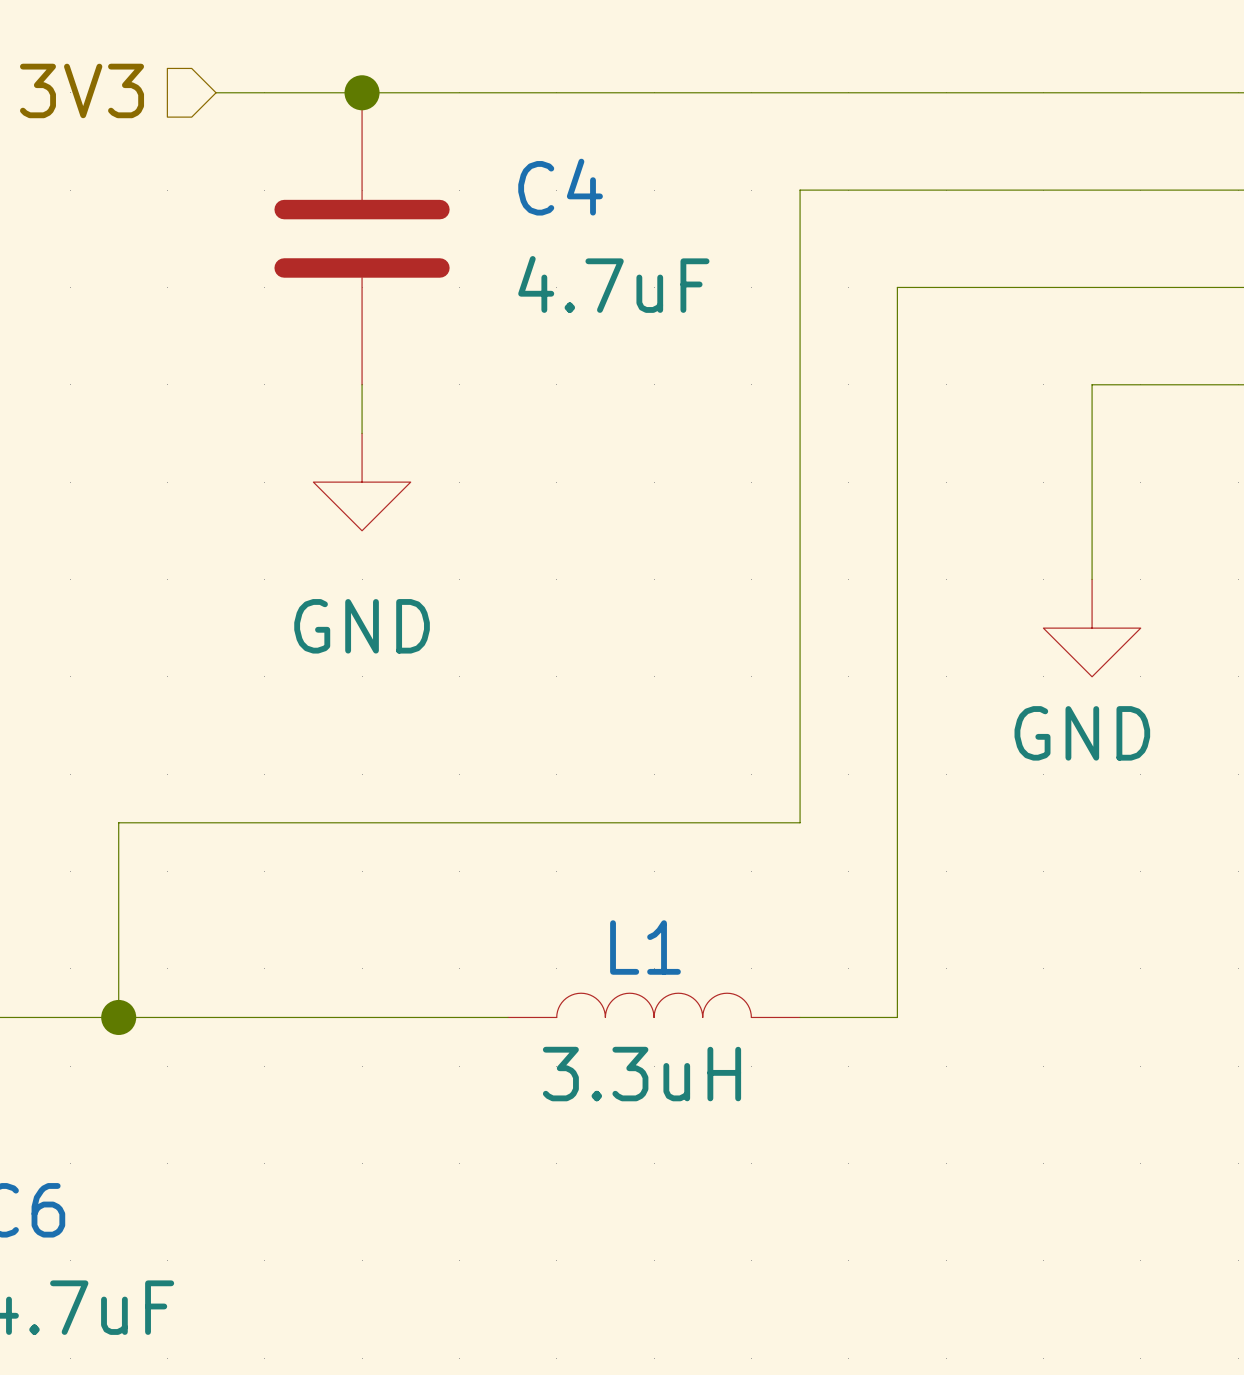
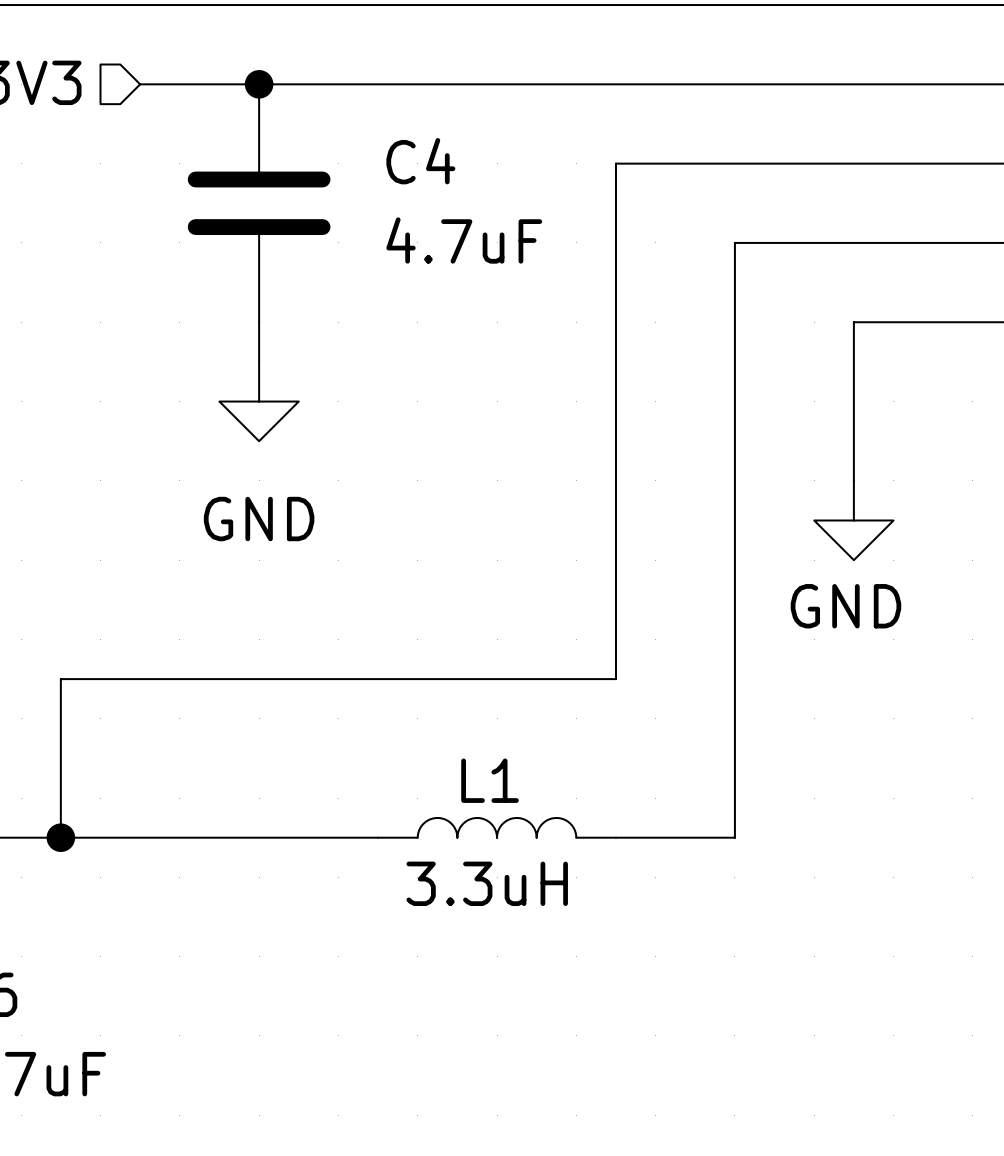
wire: (946, 287) (897, 287) (897, 1017) -> (734, 242) (734, 837) (695, 837)

